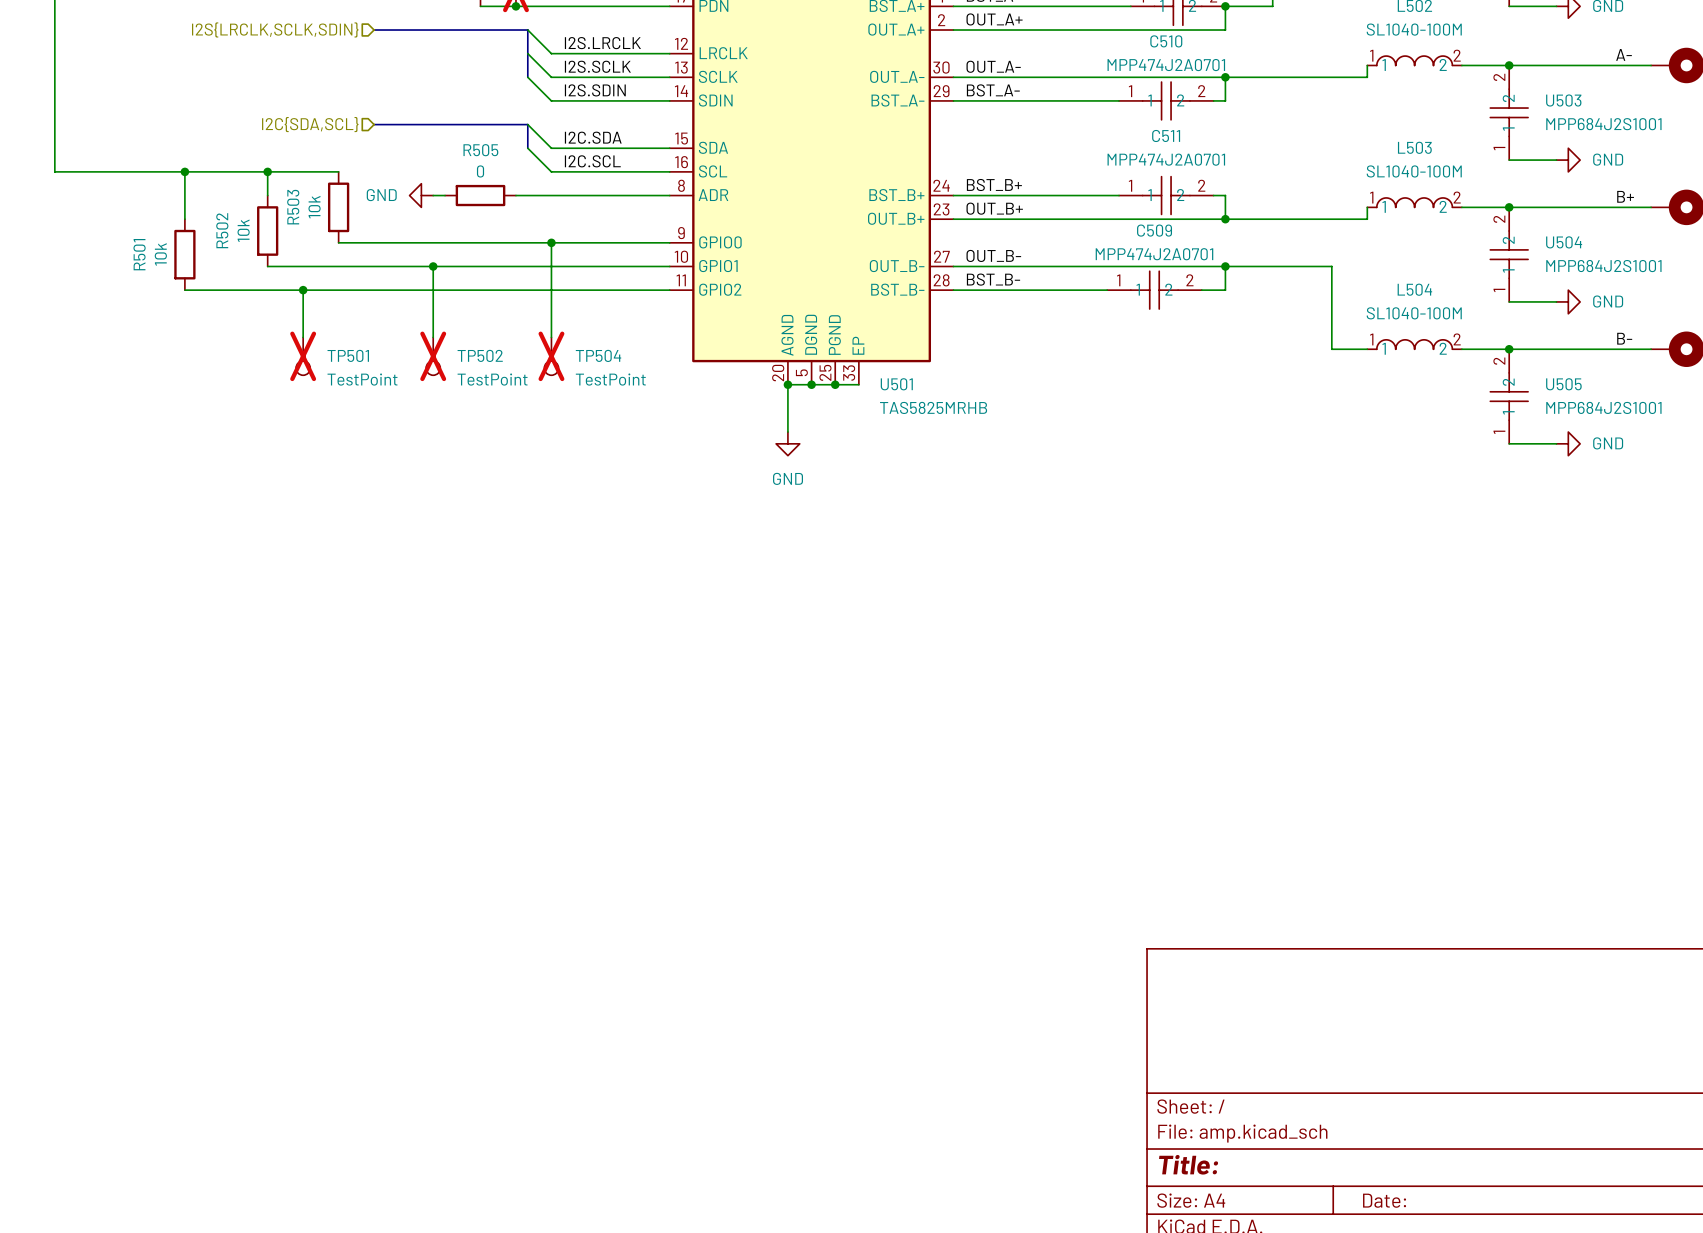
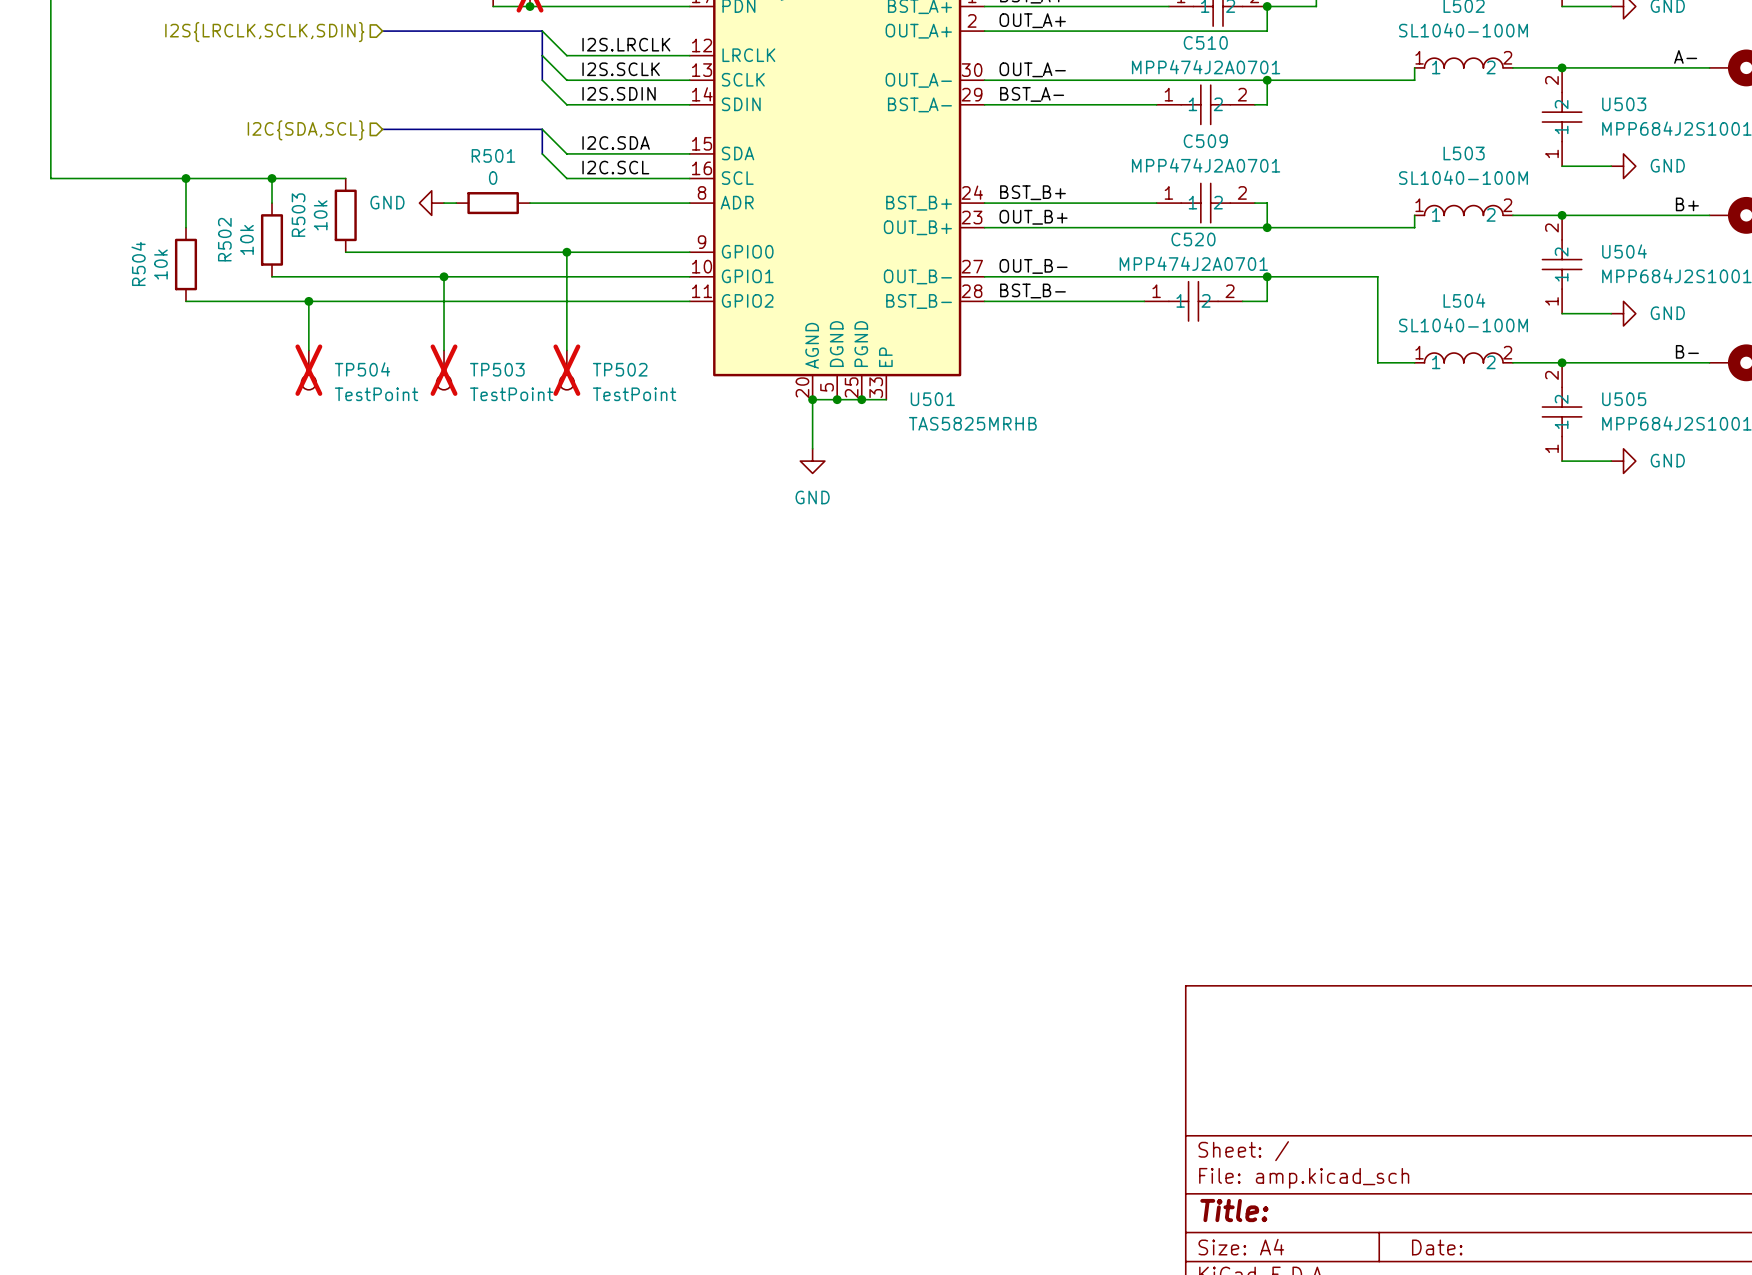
C511 name: C511 (1166, 135) -> C509 (1205, 141)
R505 name: R505 (480, 150) -> R501 (493, 155)
C509 name: C509 (1154, 230) -> C520 (1193, 239)
R501 name: R501 (139, 254) -> R504 (138, 263)
TP501 name: TP501 (348, 355) -> TP504 (362, 369)
TP502 name: TP502 (480, 355) -> TP503 (497, 369)
TP504 name: TP504 (598, 355) -> TP502 (620, 369)

